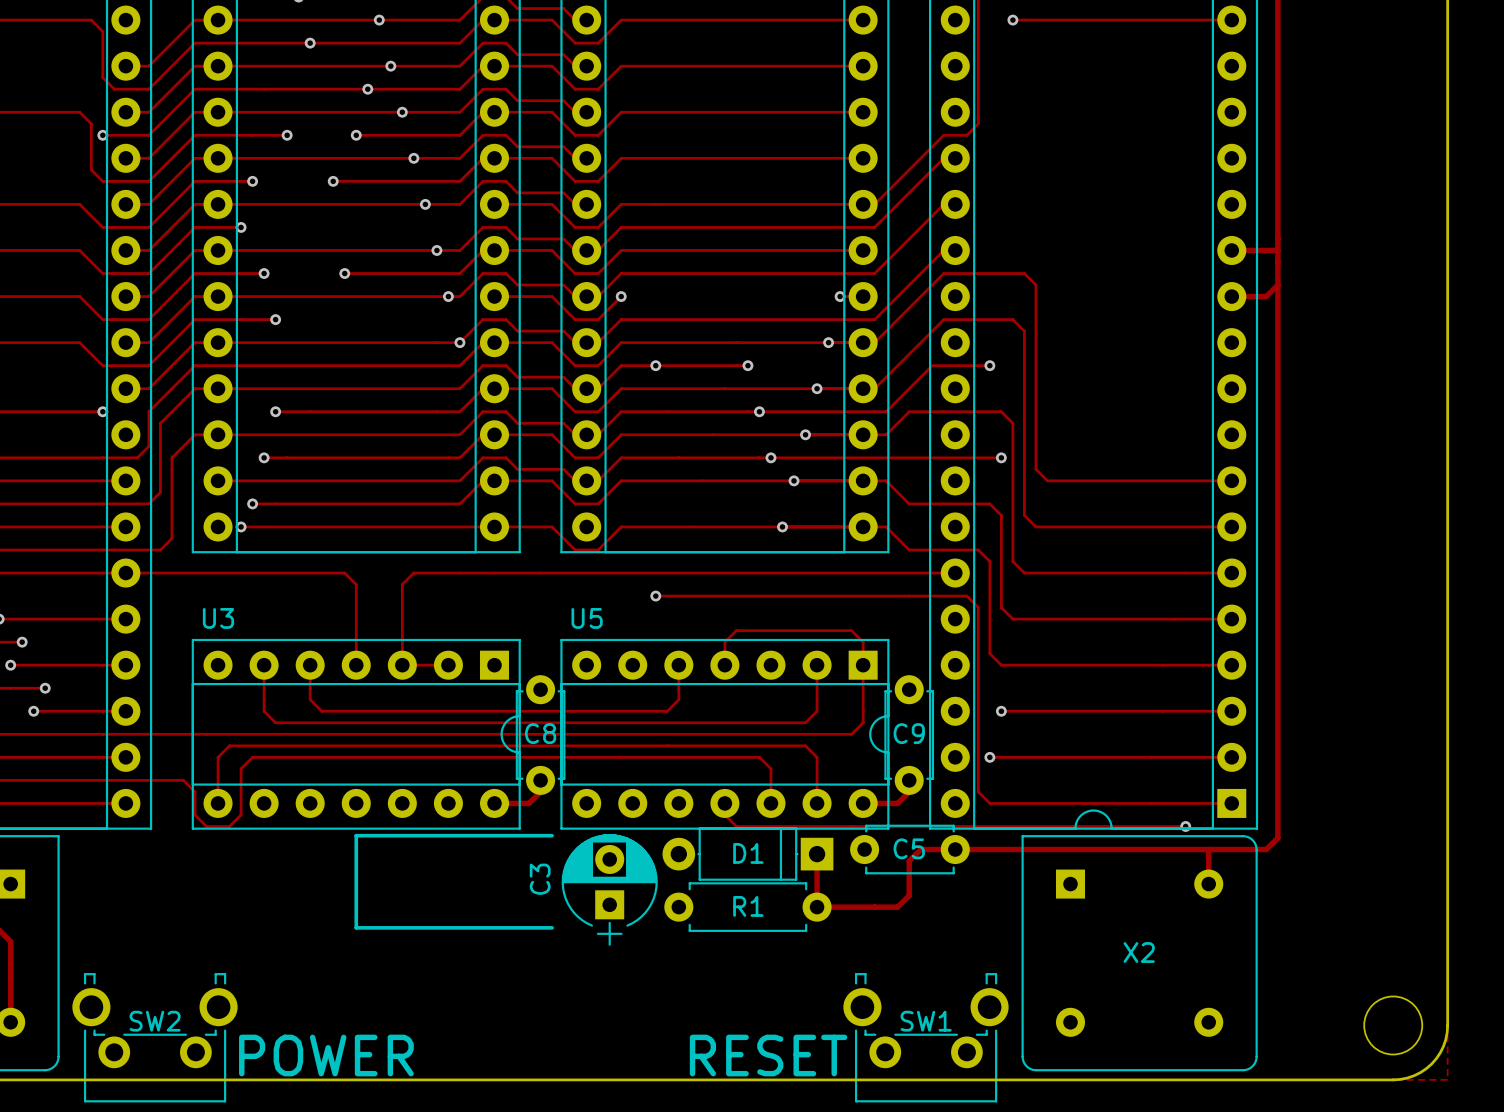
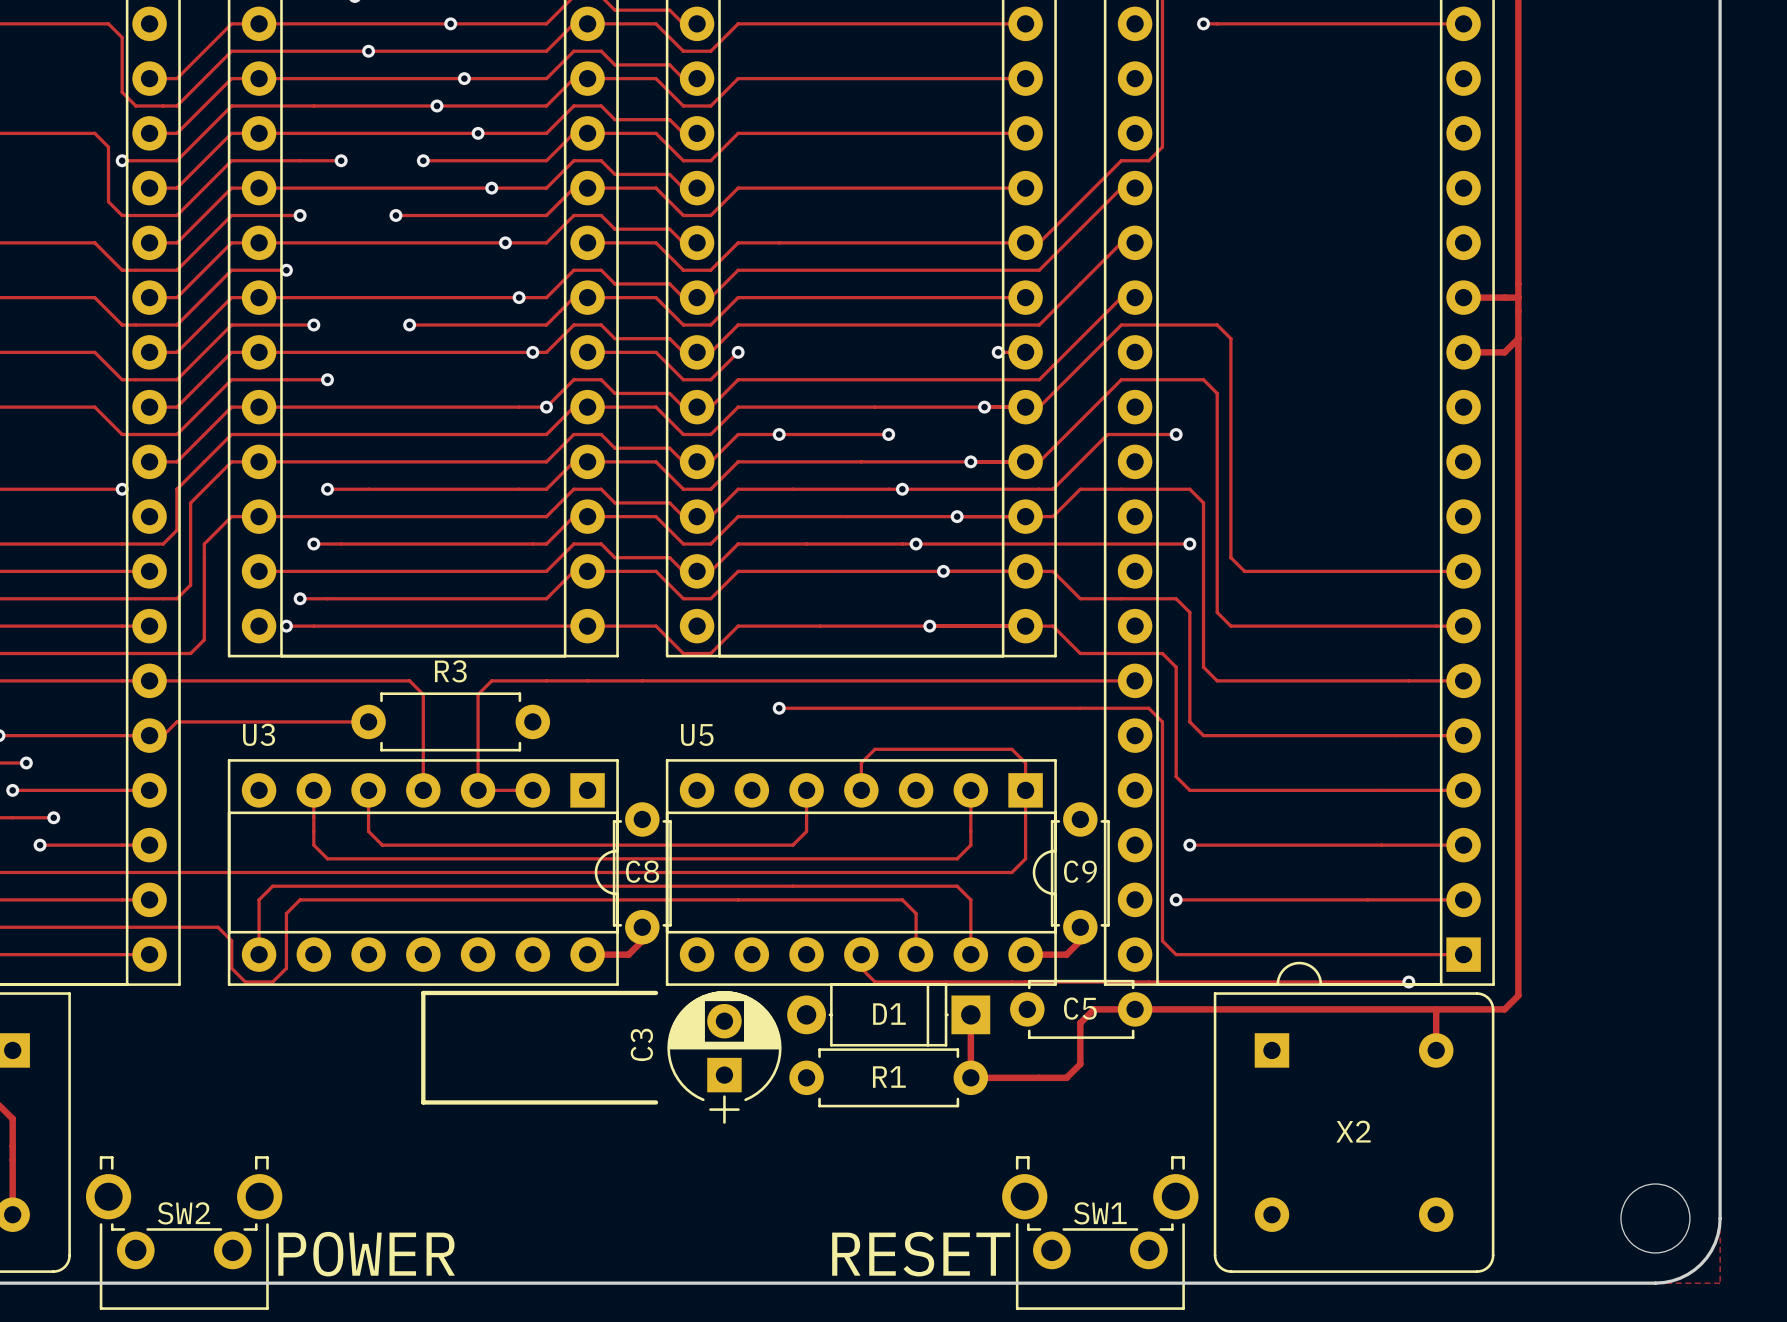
track: none -> (368, 721) (176, 721) (163, 735) (149, 735)
R3: none -> (450, 721)

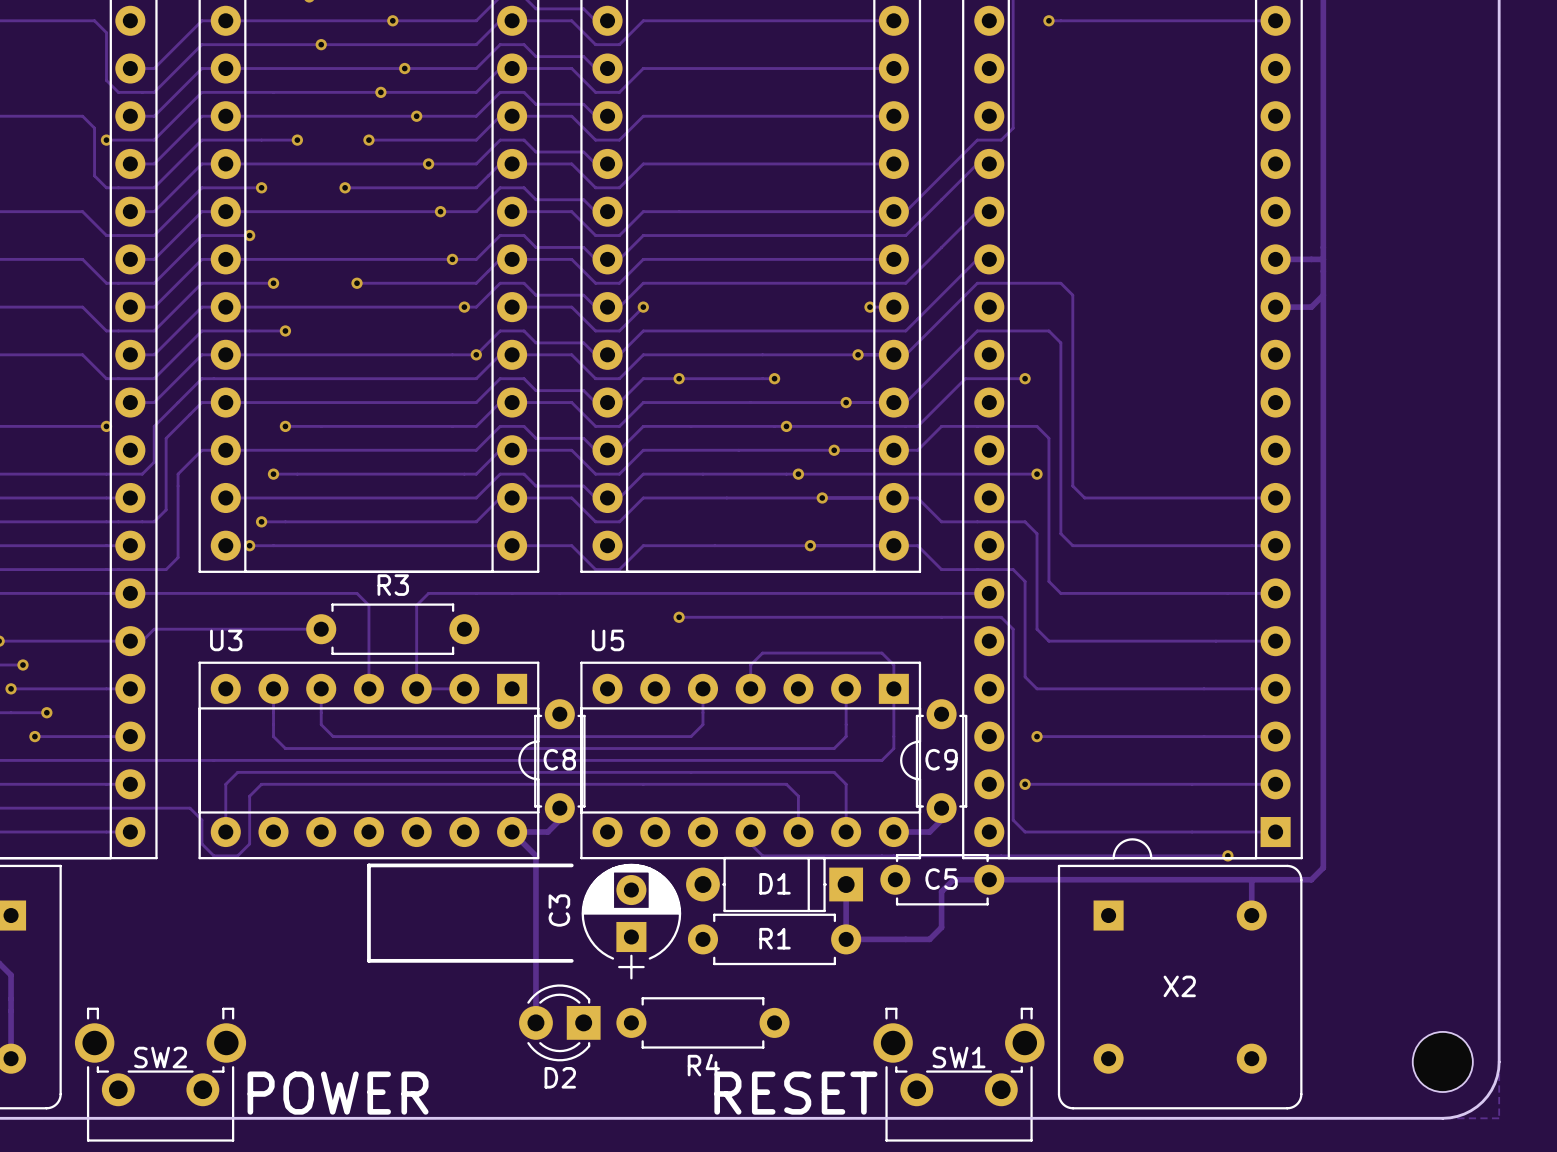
track: none -> (512, 832) (535, 855) (535, 1022)
D2: none -> (559, 1022)
R4: none -> (702, 1022)

